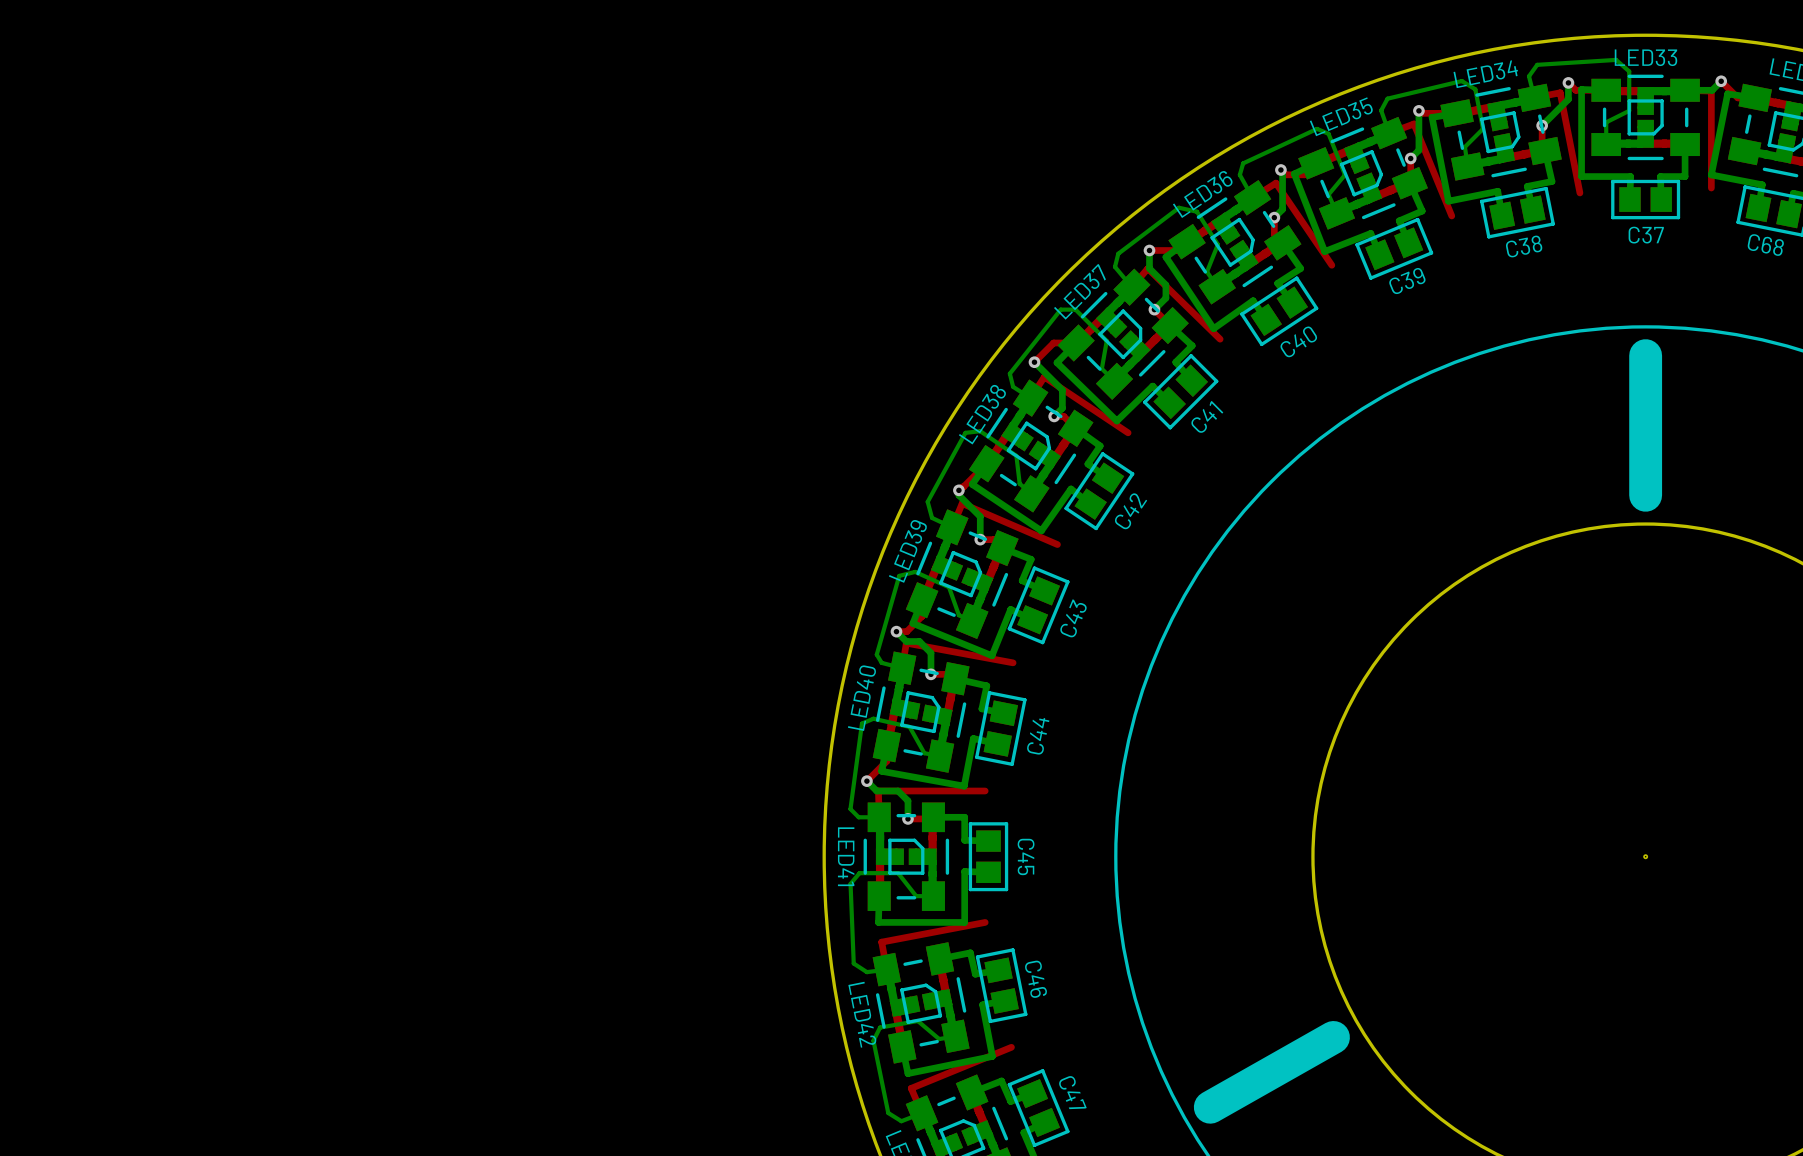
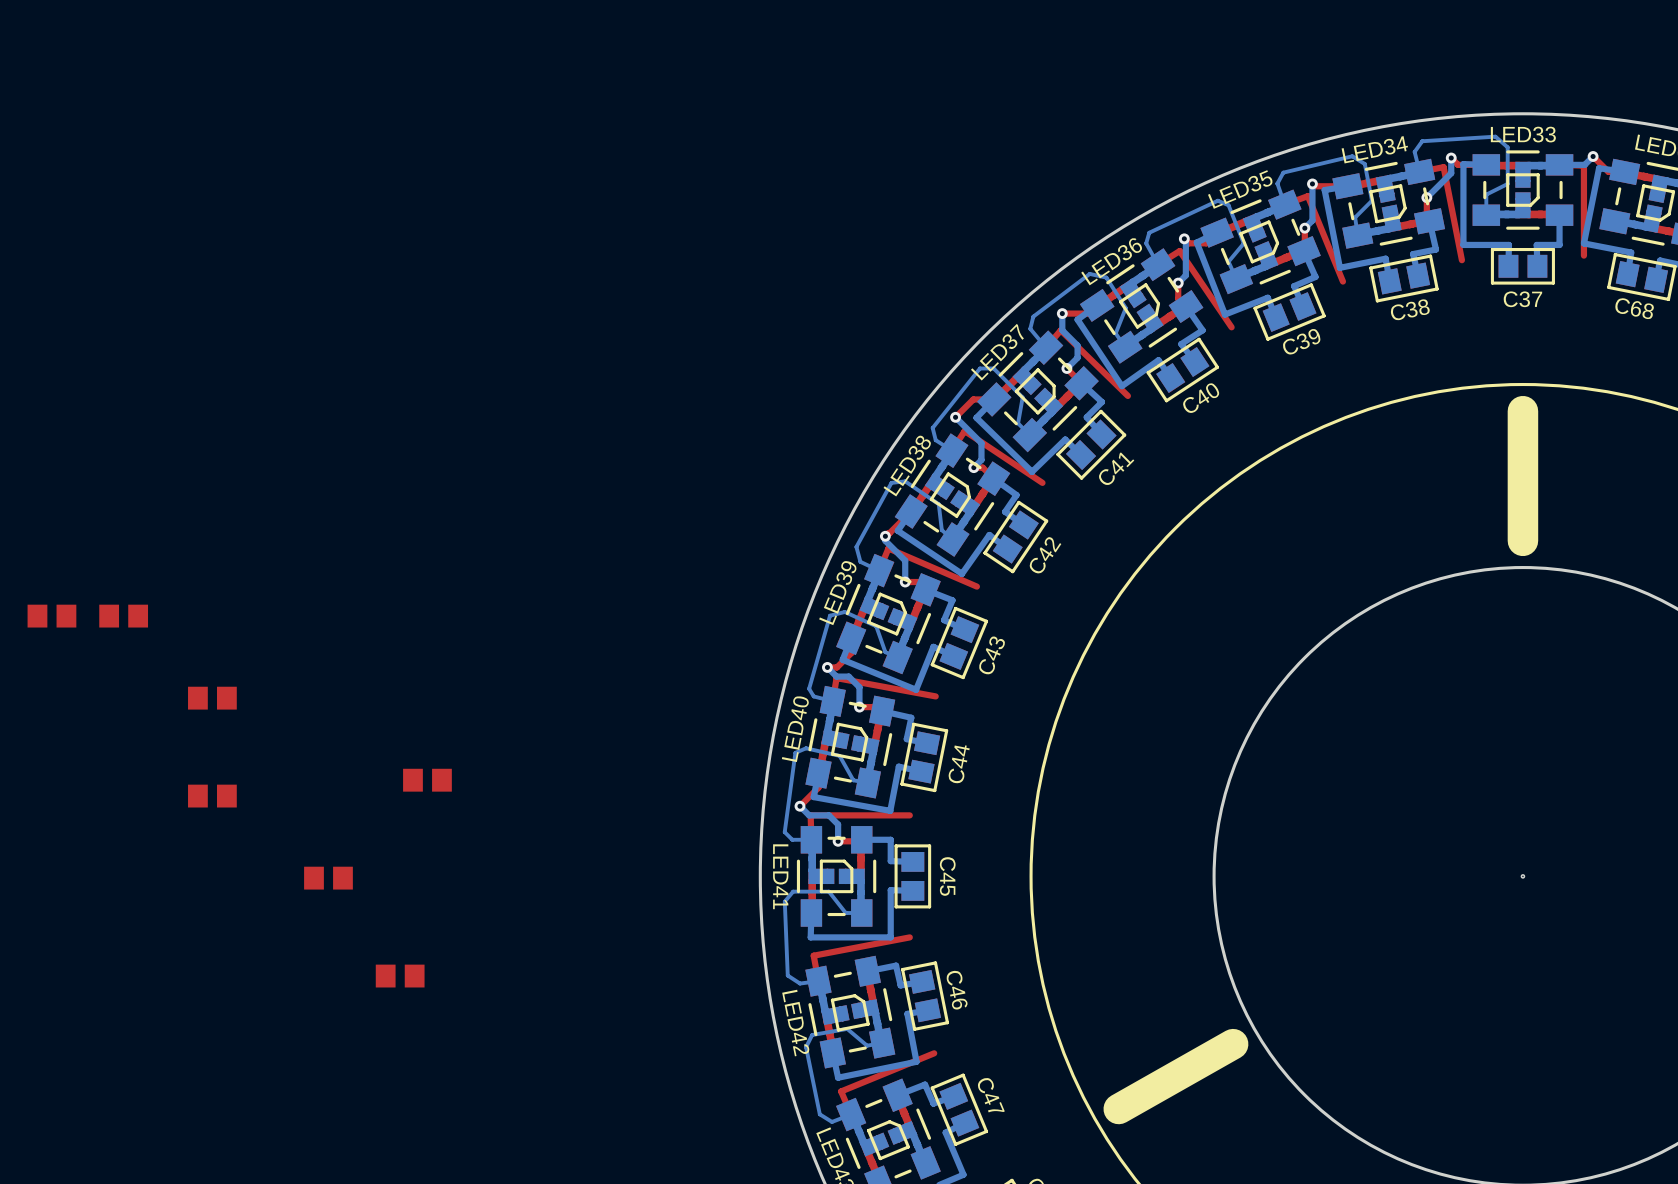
part: none -> (51, 616)
part: none -> (123, 616)
part: none -> (212, 698)
part: none -> (427, 780)
part: none -> (212, 796)
part: none -> (328, 878)
part: none -> (400, 976)

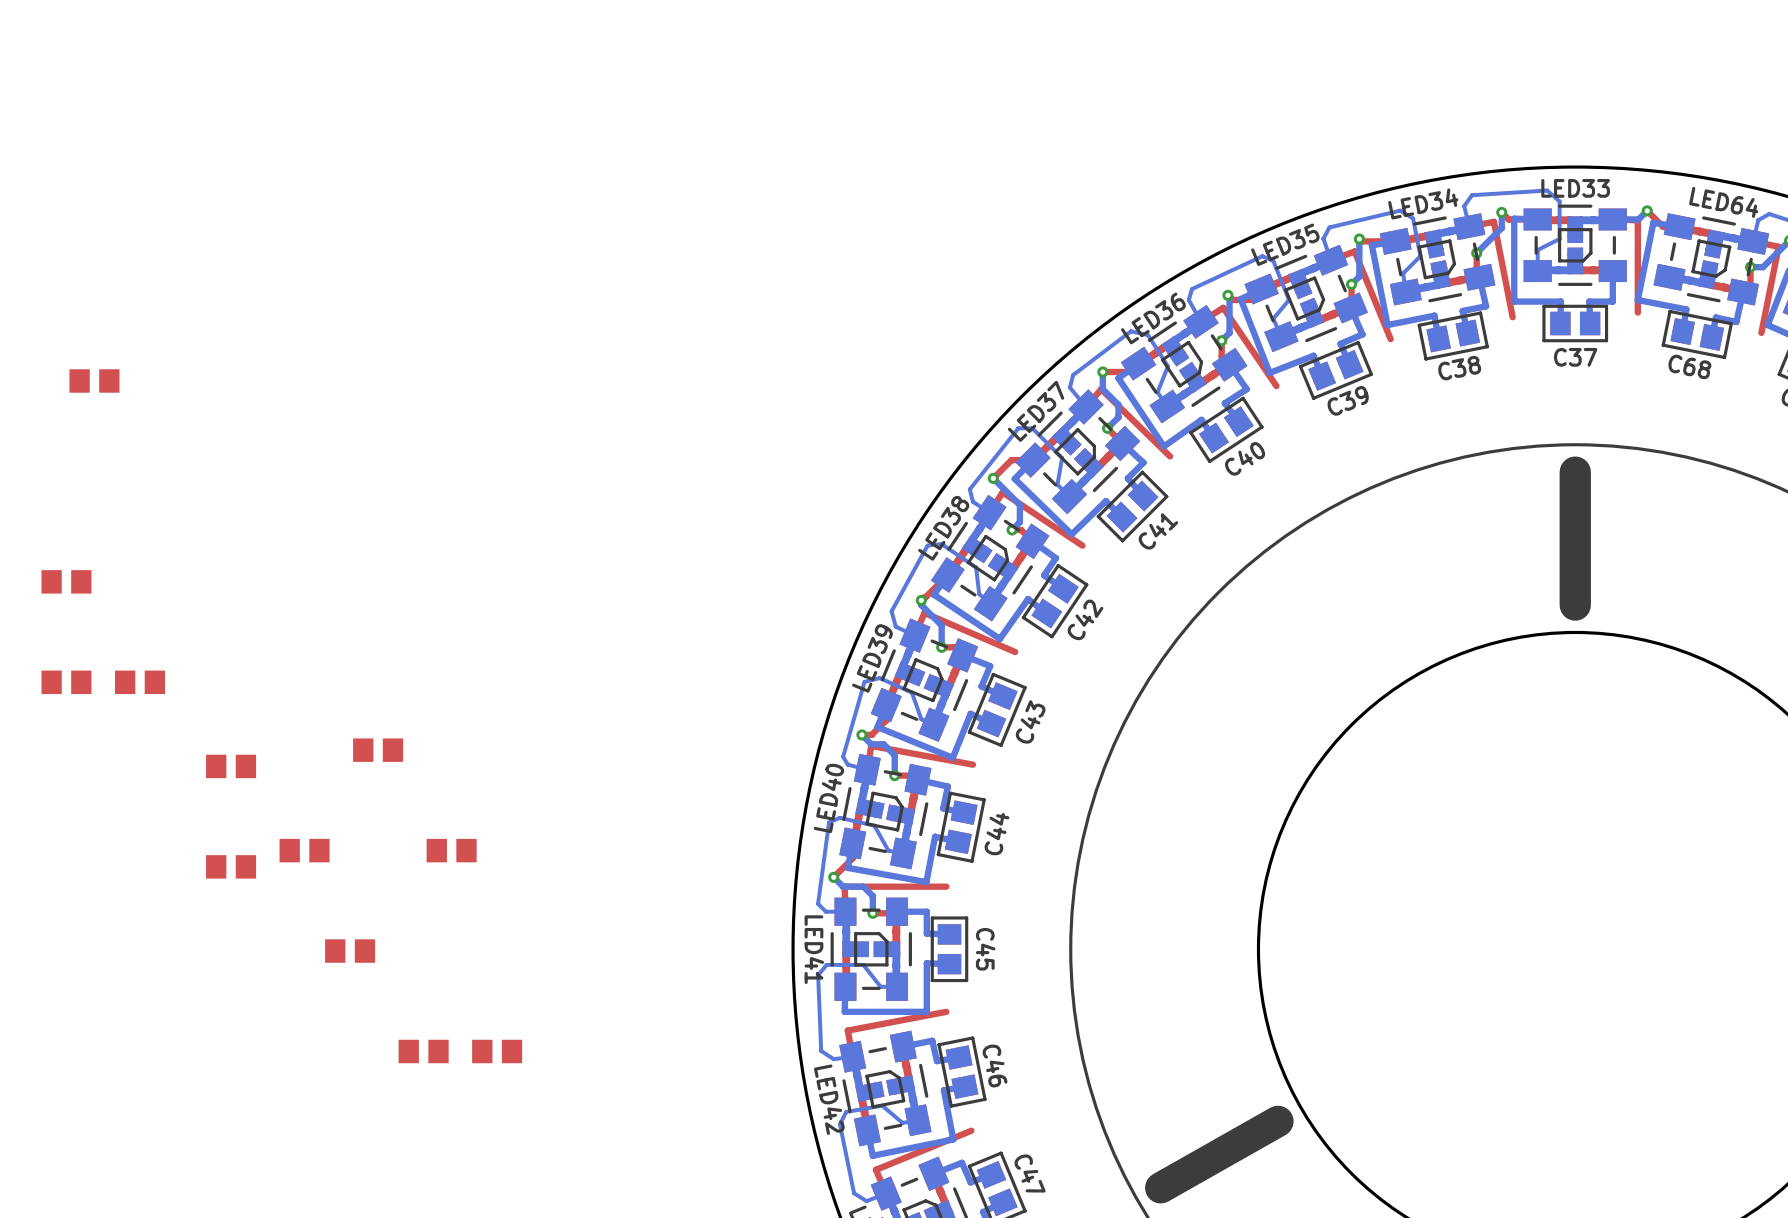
part: none -> (94, 380)
part: none -> (66, 581)
part: none -> (378, 750)
part: none -> (304, 850)
round board edge: [1520, 874, 1526, 879] -> none
part: none -> (497, 1051)

